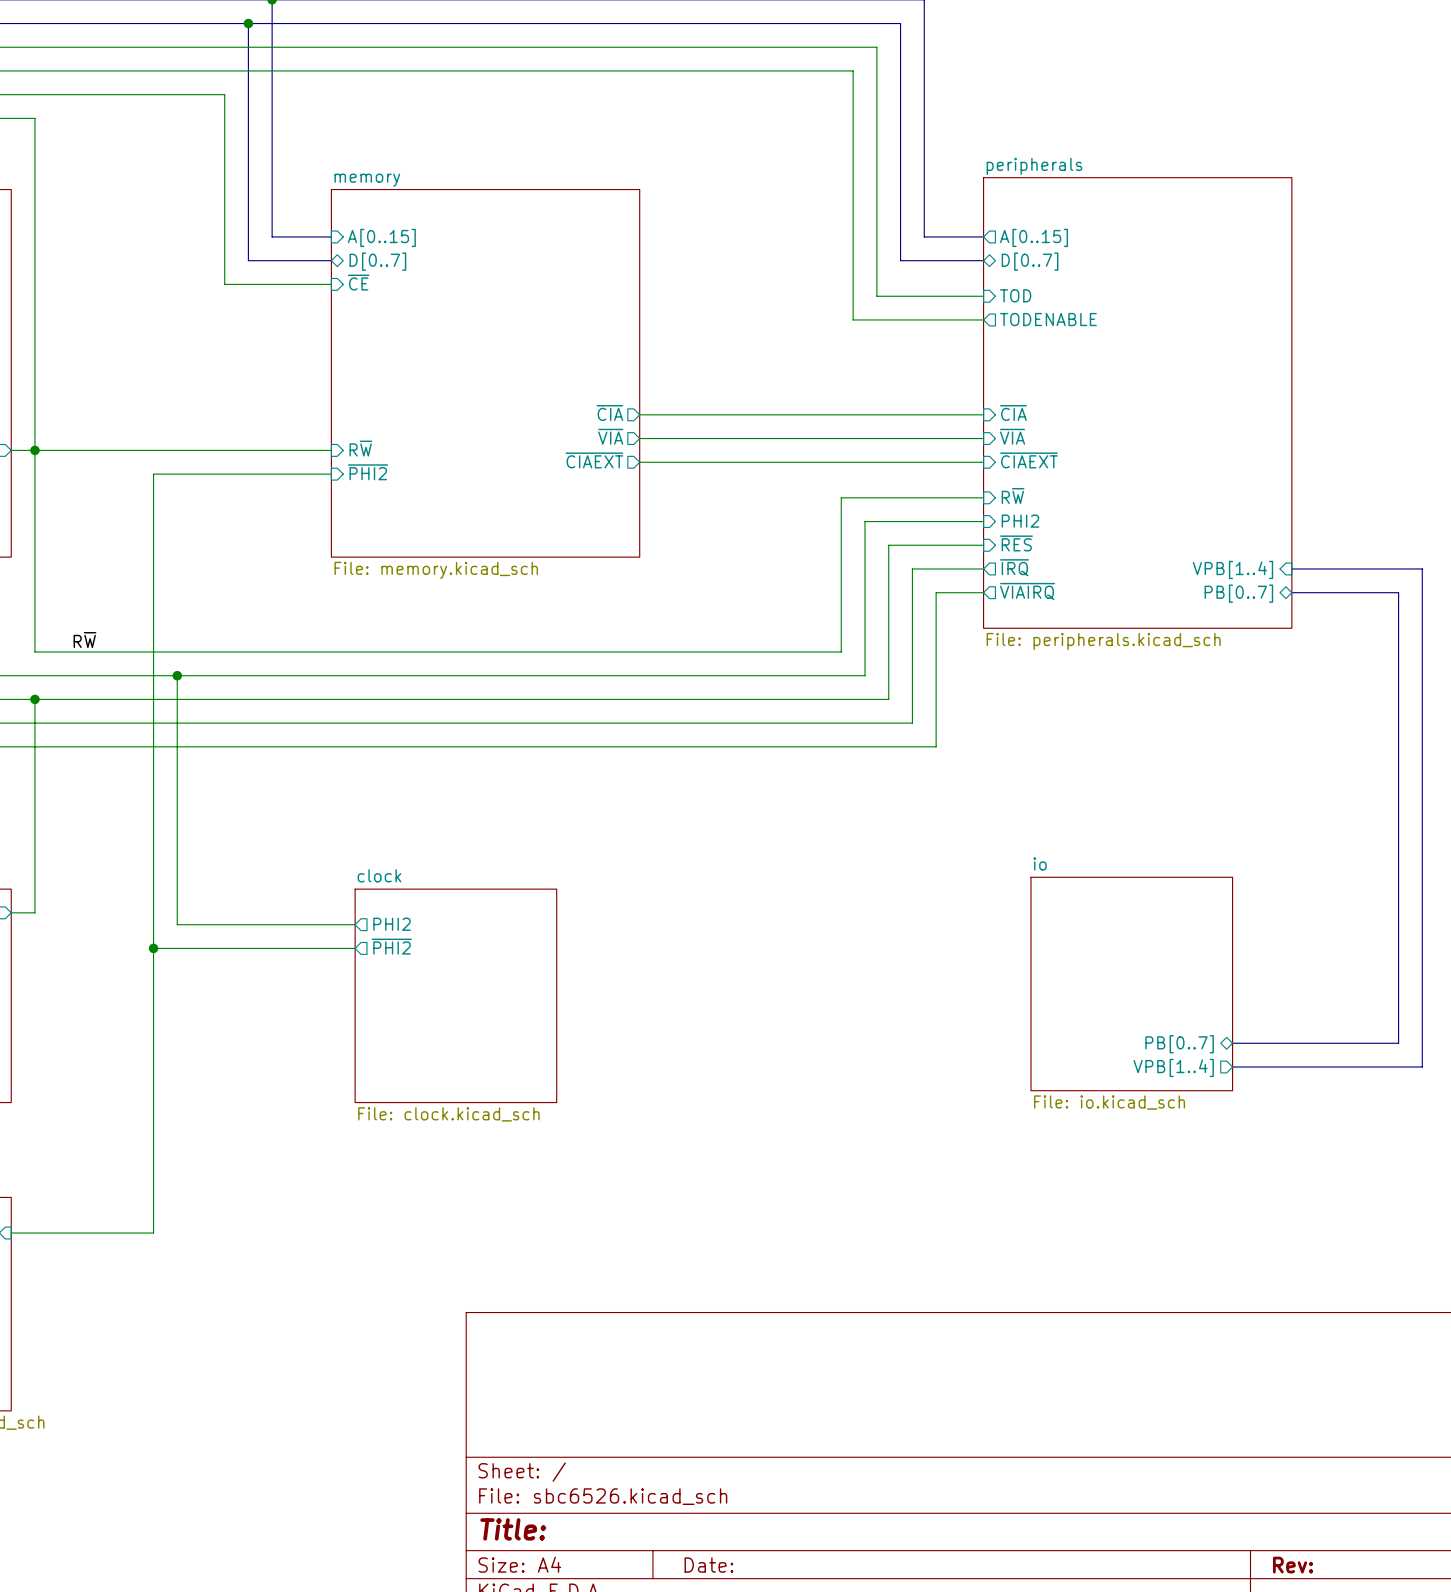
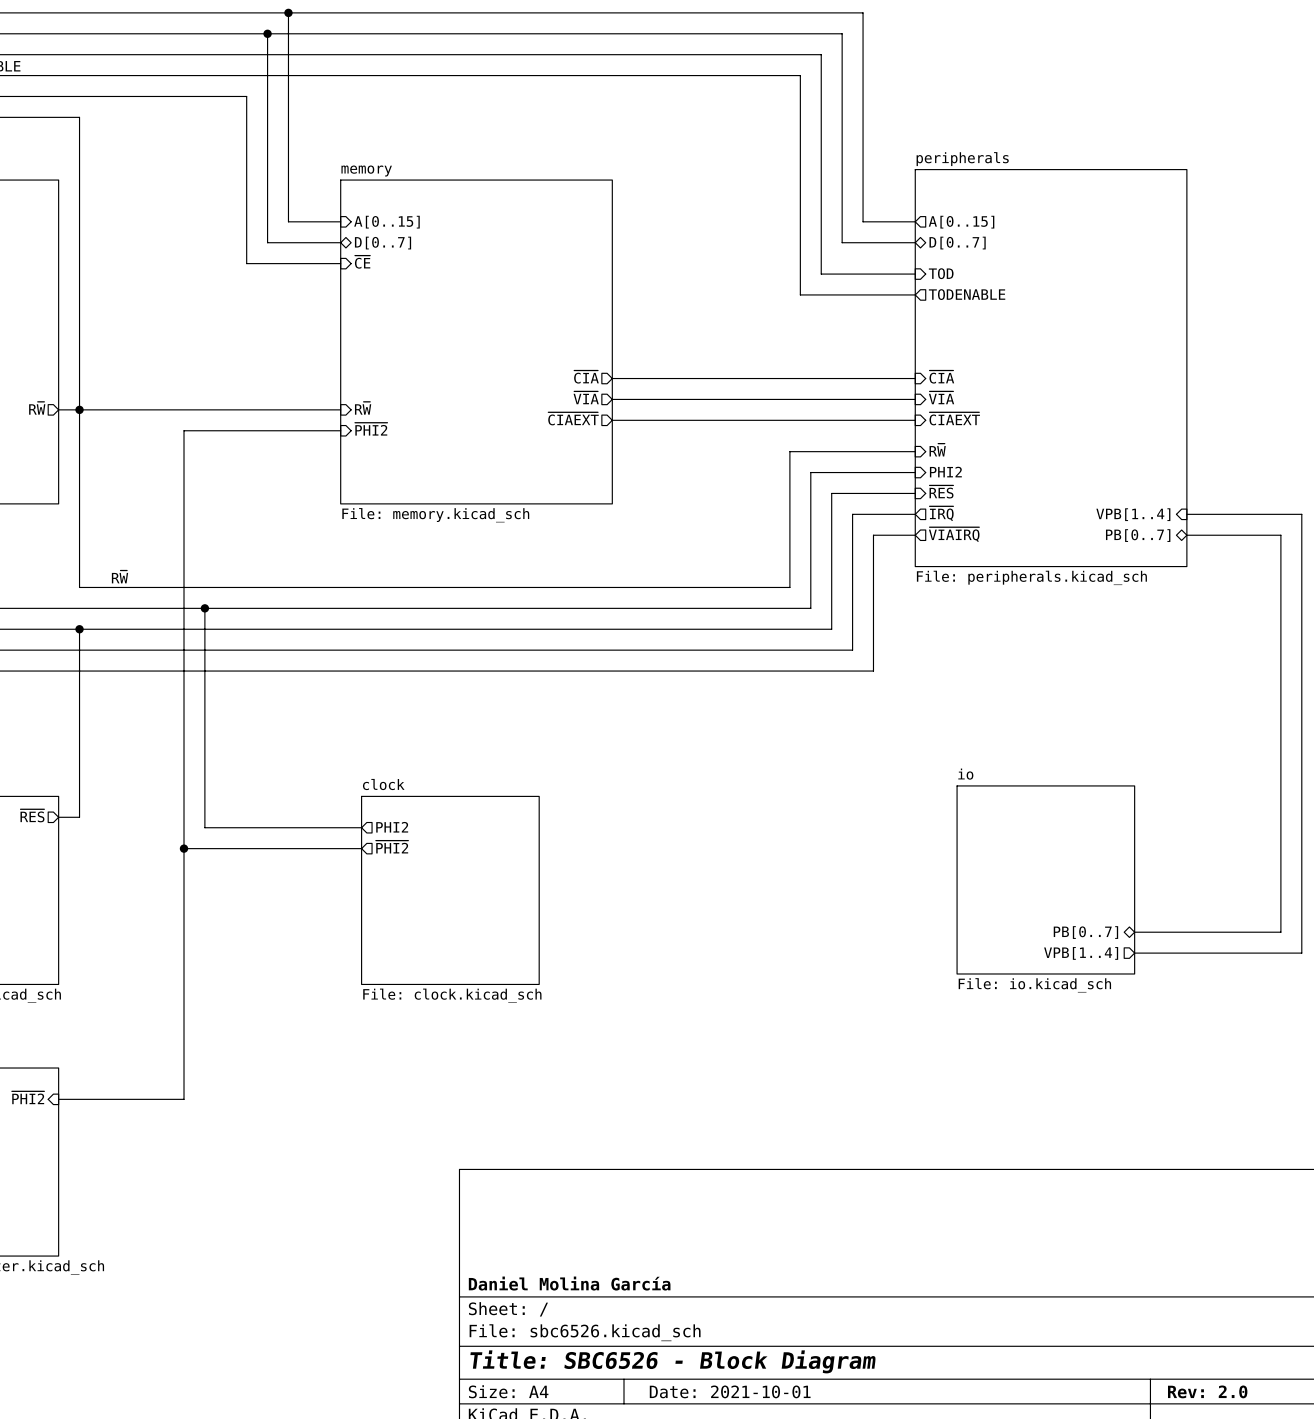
title block: none -> Daniel Molina García (569, 1283)
title block: Title: (513, 1529) -> Title: SBC6526 - Block Diagram (673, 1361)
title block: Date: (708, 1565) -> Date: 2021-10-01 (730, 1391)
title block: Rev: (1293, 1565) -> Rev: 2.0 (1207, 1391)

